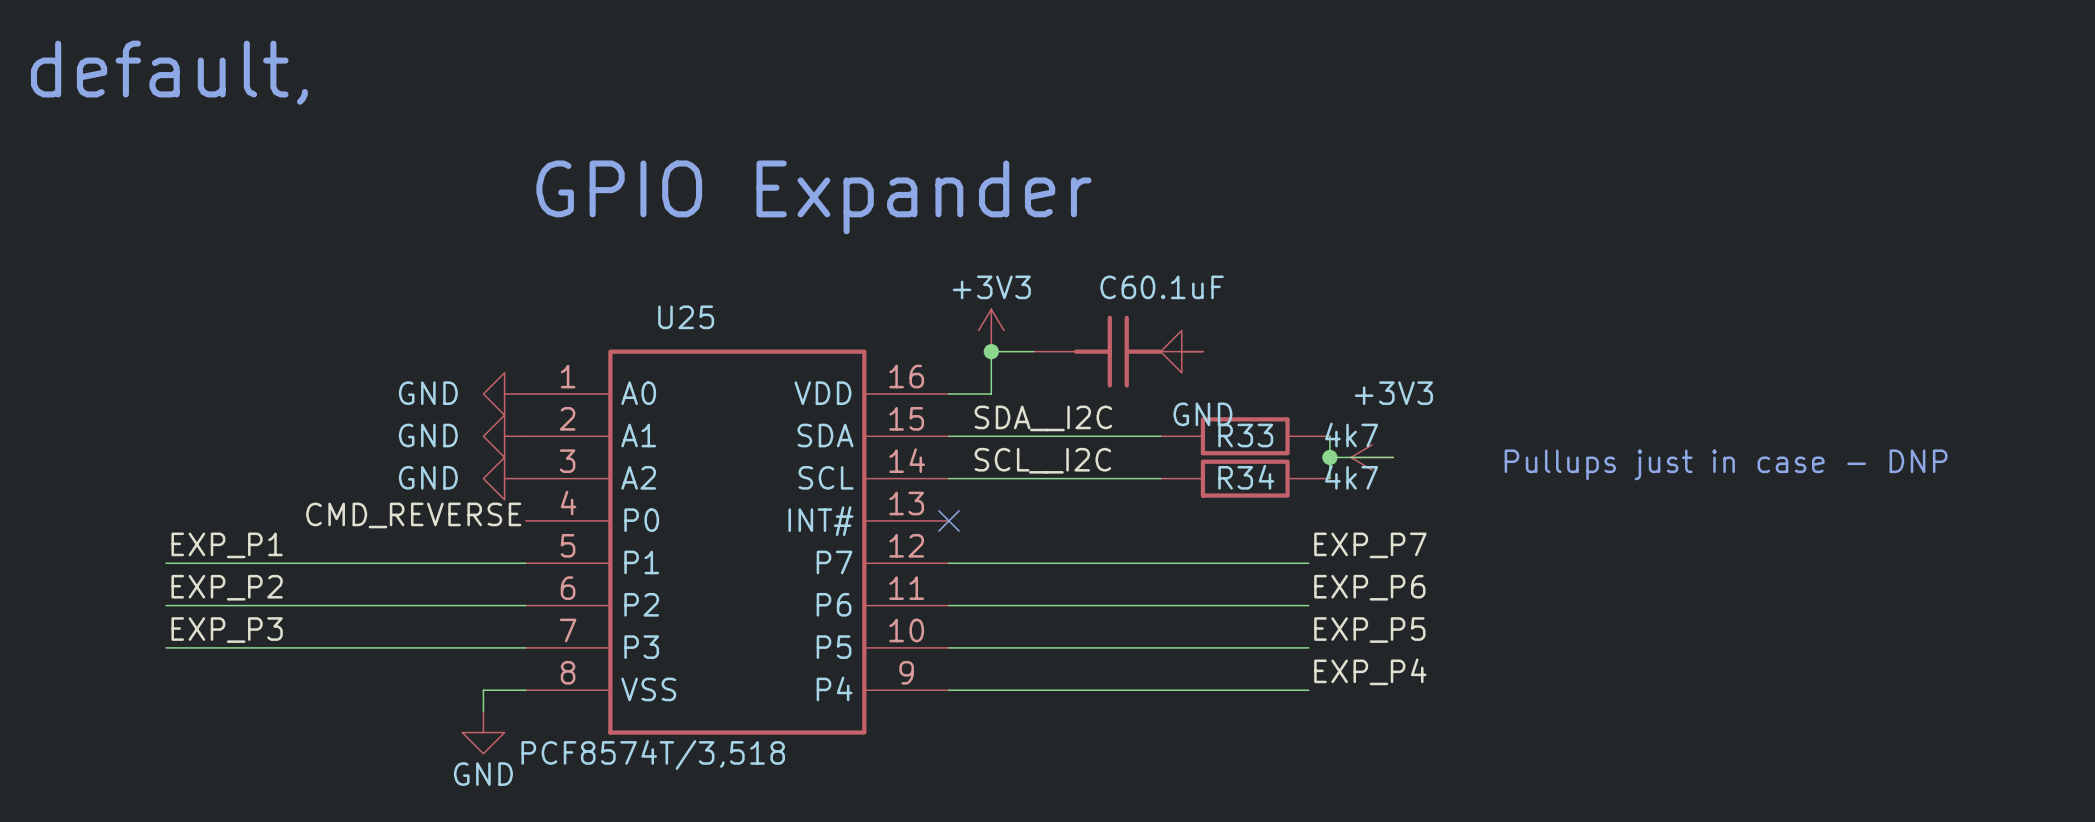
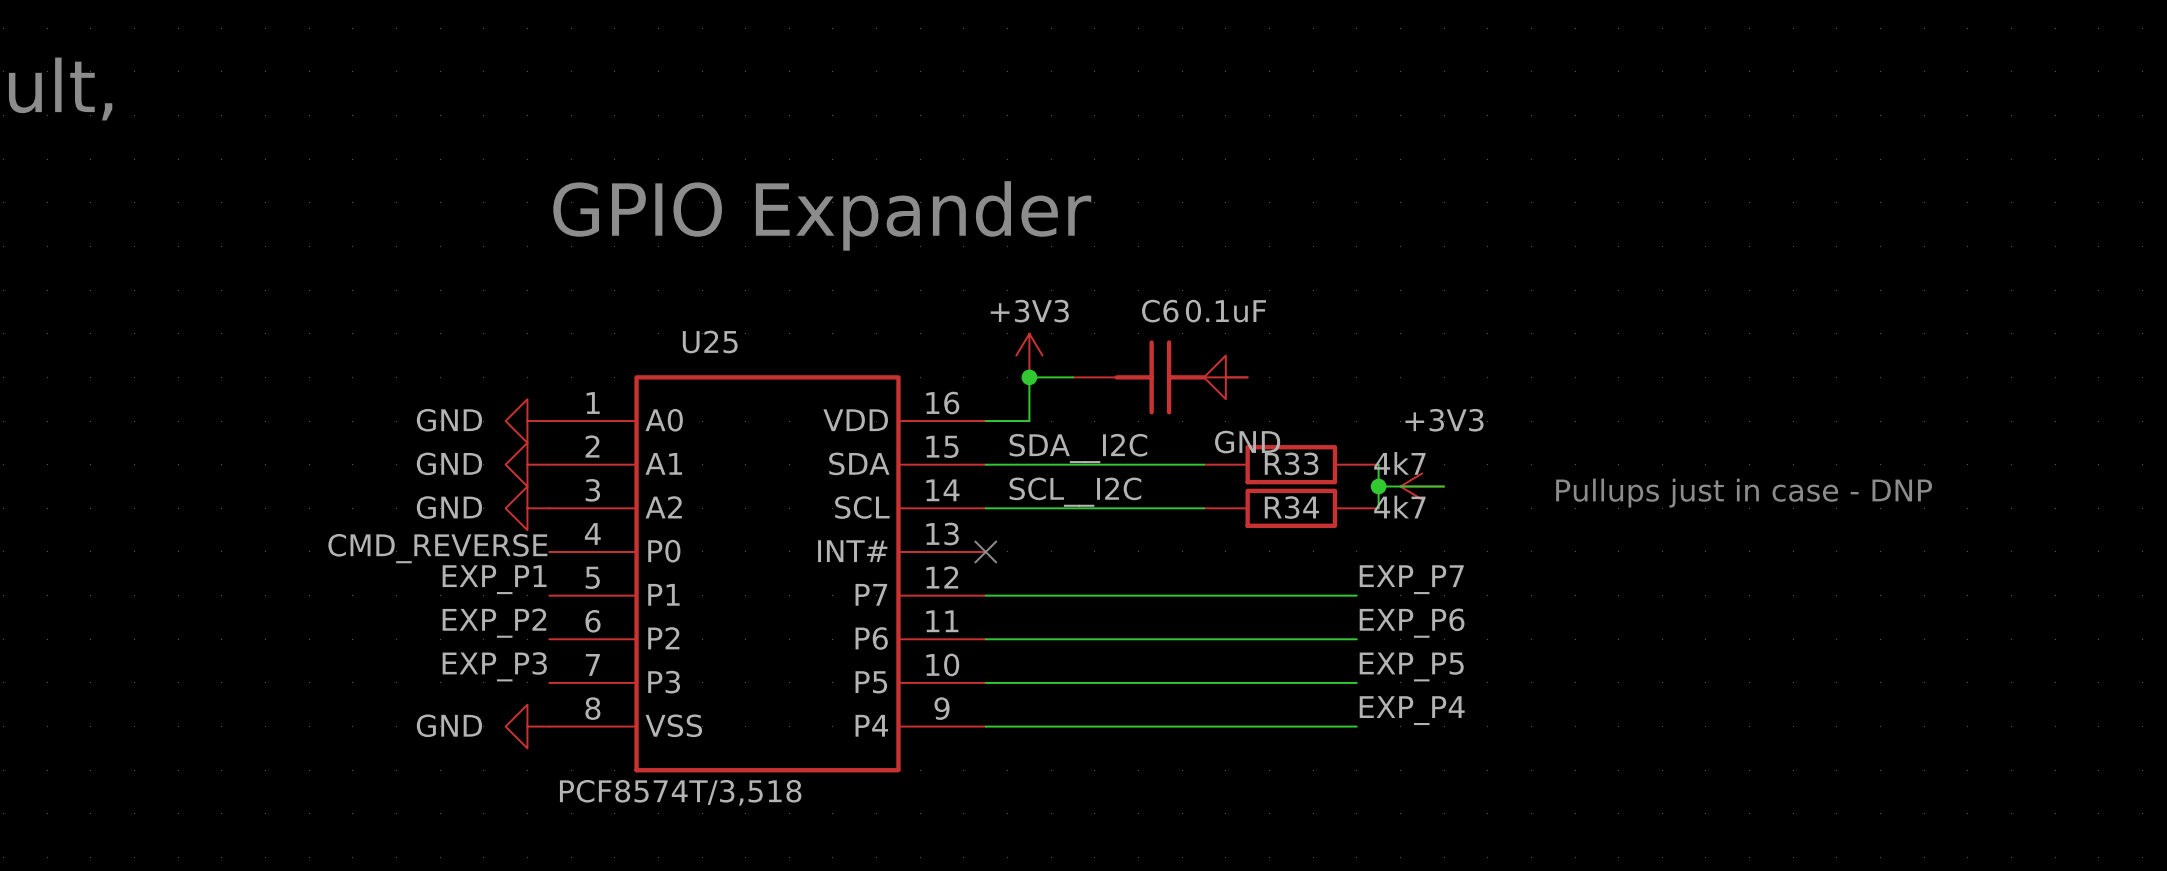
label position: EXP_P1 (227, 545) -> EXP_P1 (494, 579)
wire: (166, 563) (525, 563) -> none
label position: EXP_P2 (227, 587) -> EXP_P2 (494, 623)
wire: (166, 605) (525, 605) -> none
label position: EXP_P3 (227, 630) -> EXP_P3 (494, 666)
wire: (166, 647) (525, 647) -> none
wire: (525, 690) (483, 690) (483, 711) -> none
power symbol rotation: 0° (483, 732) -> 90° clockwise (527, 726)
power symbol position: GND (483, 732) -> GND (527, 726)
power symbol text position: GND (483, 774) -> GND (449, 725)

